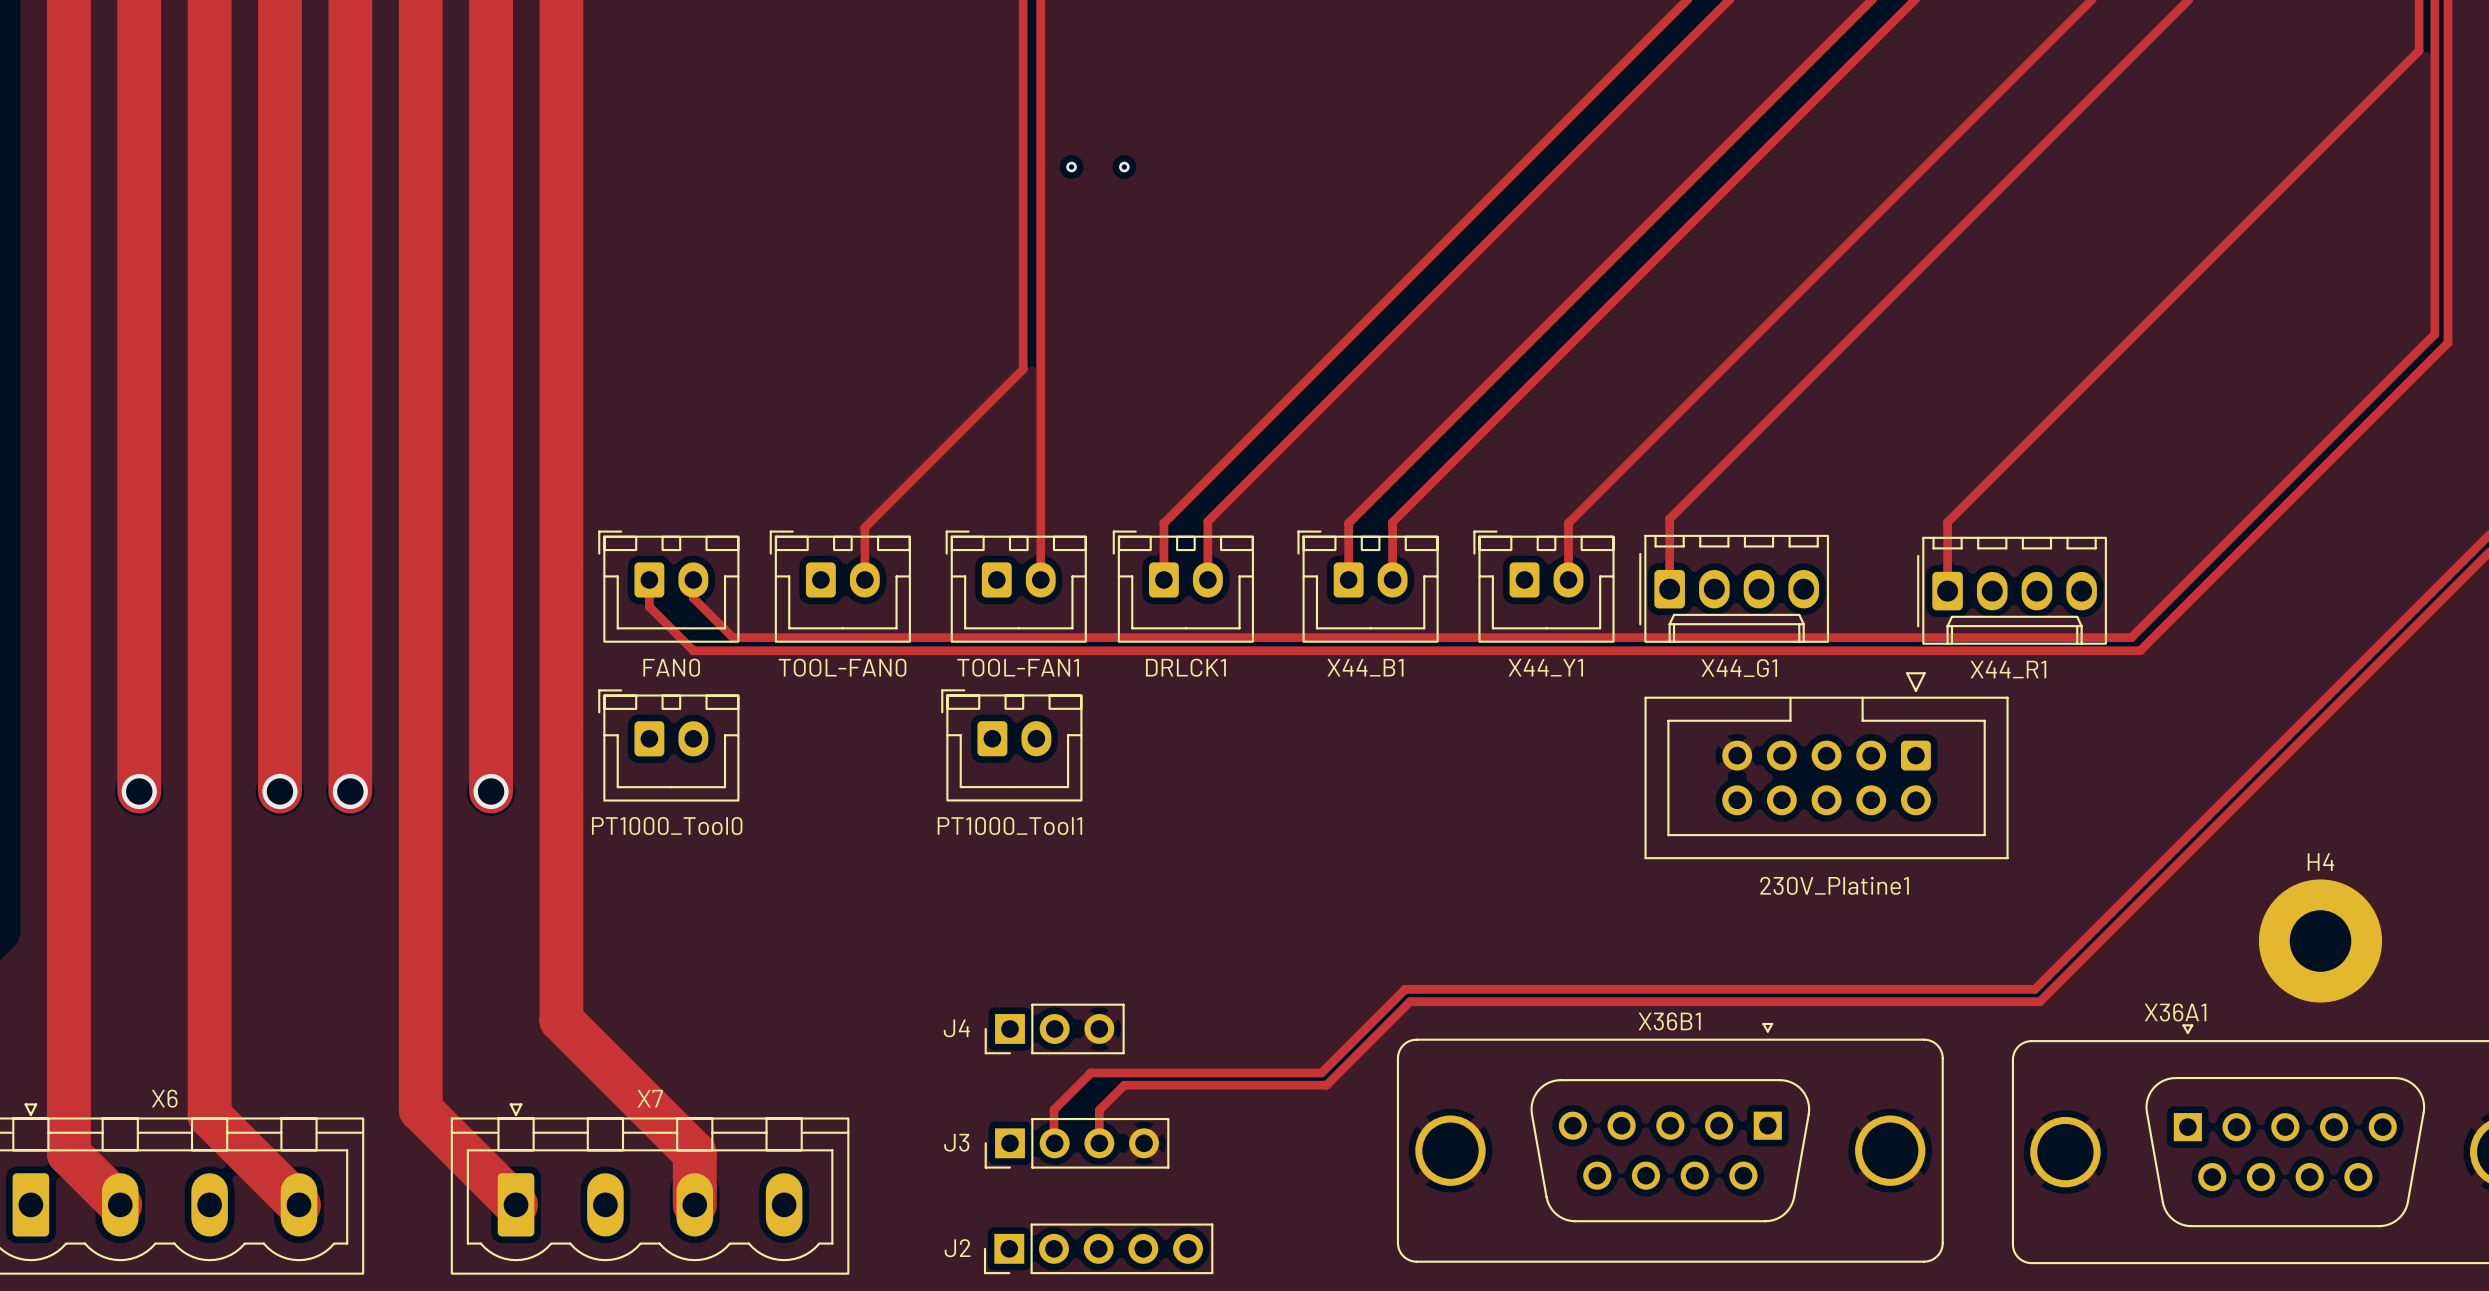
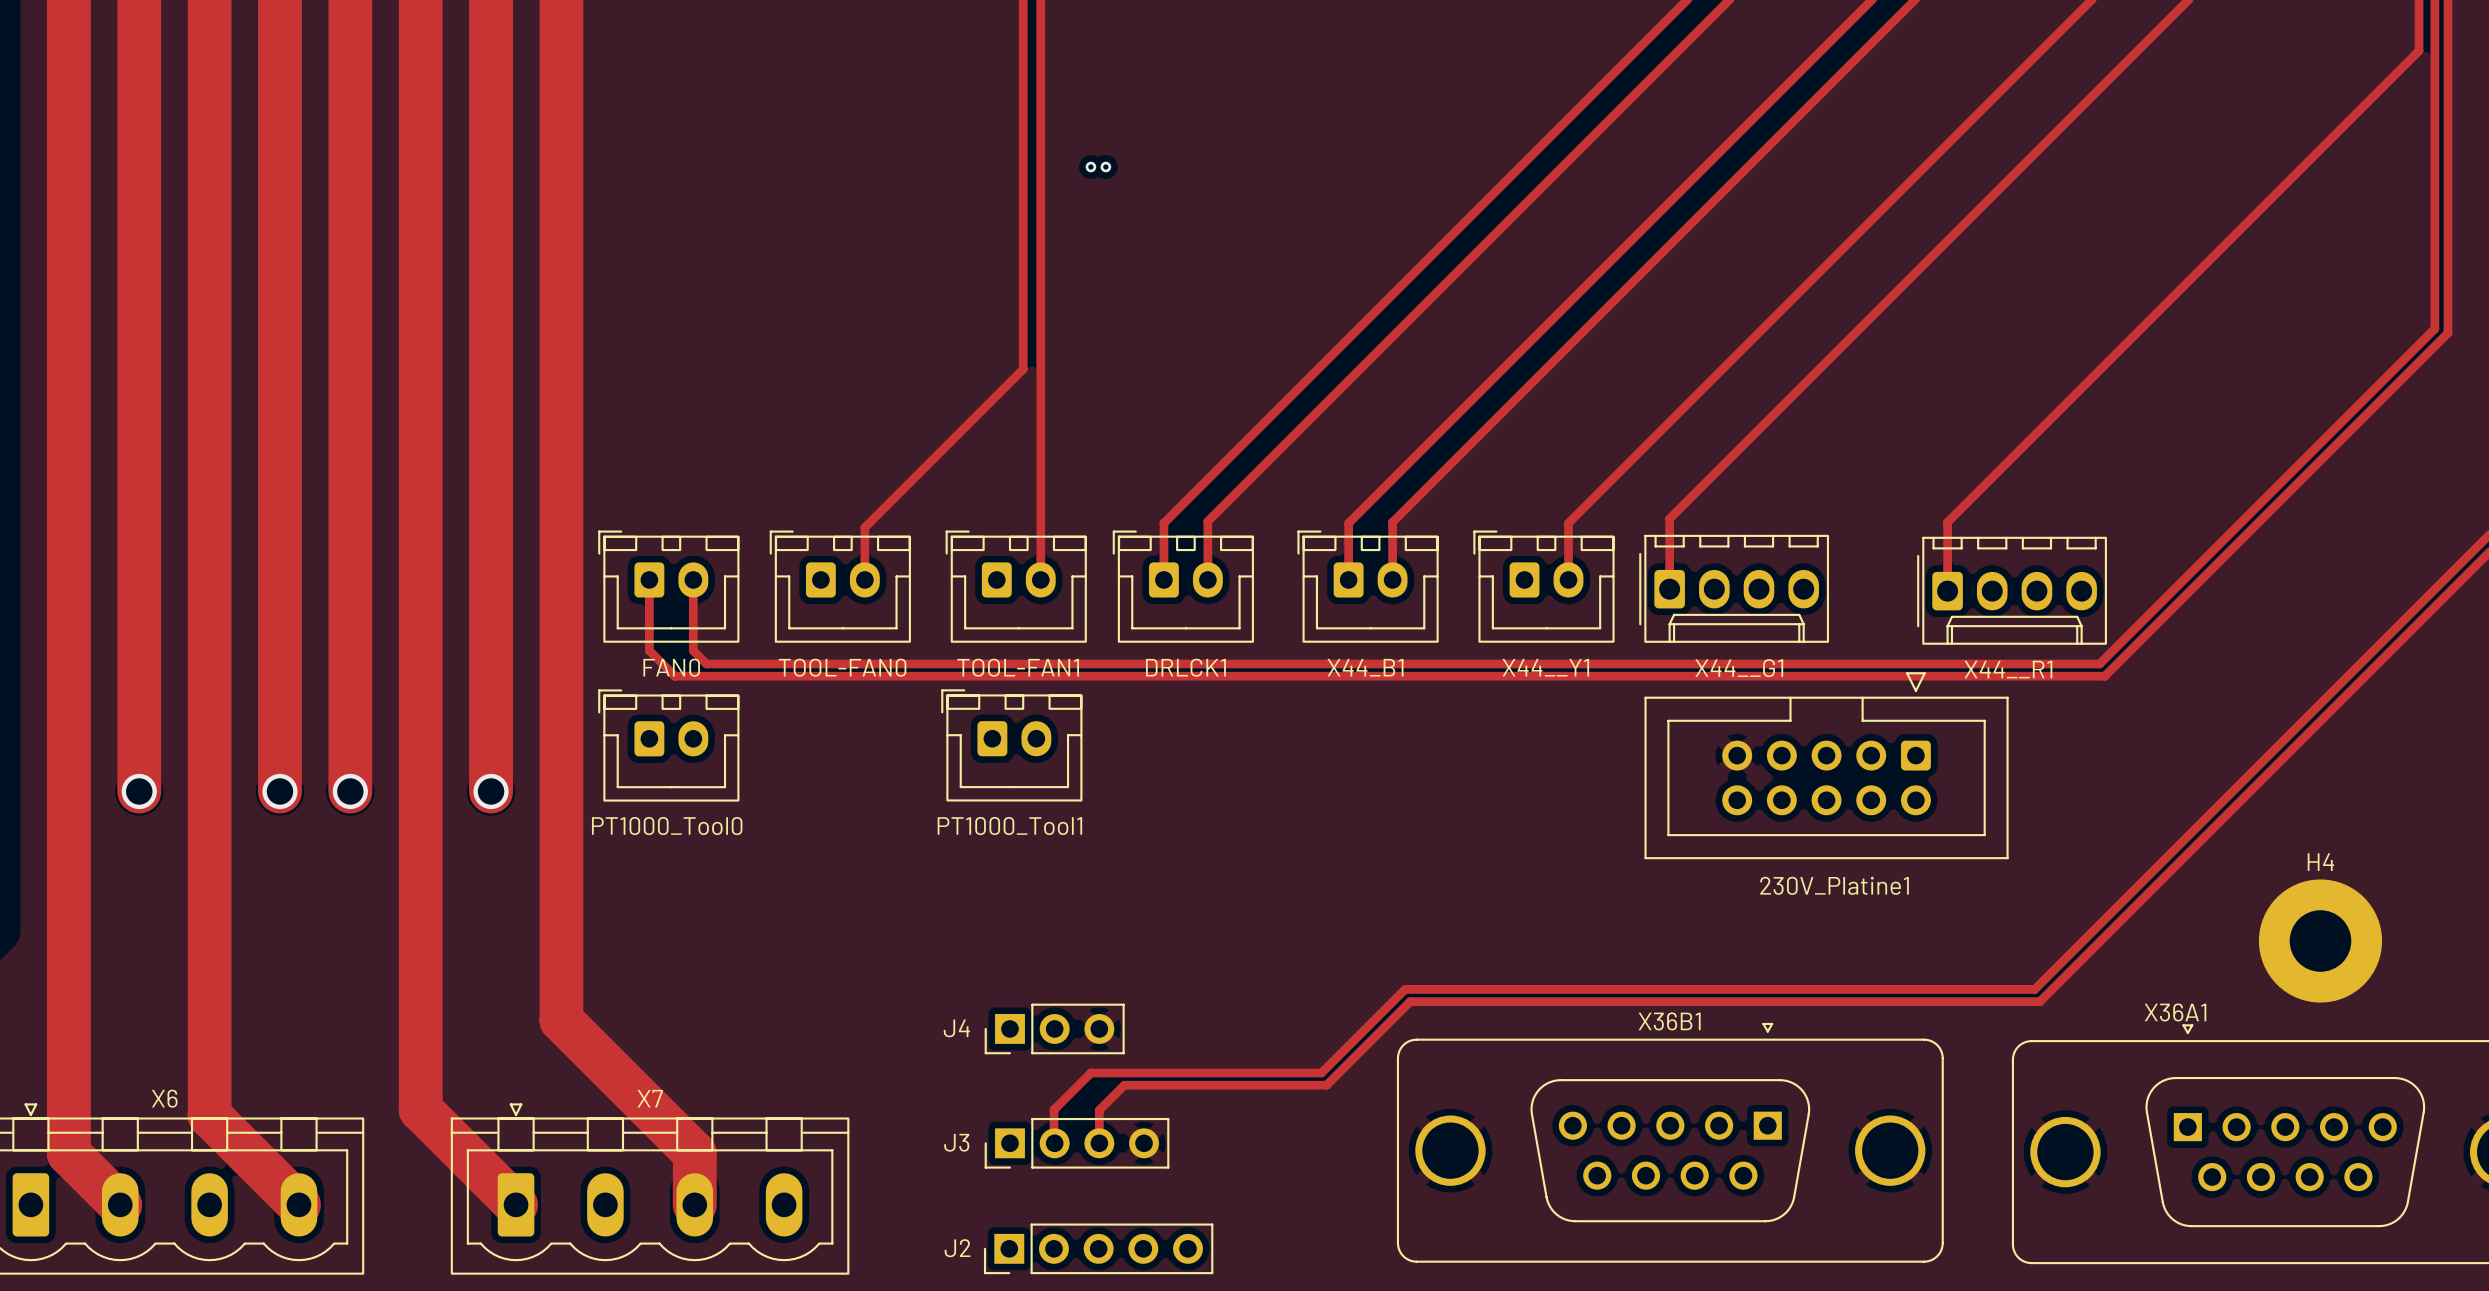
via: (1071, 167) -> none
via: none -> (1090, 167)
via: none -> (1105, 167)
via: (1124, 167) -> none
track: (2434, 328) (2434, 334) (2131, 637) (732, 637) (693, 597) -> (2434, 328) (2099, 663) (706, 663) (693, 650) (693, 597)
track: (2448, 333) (2448, 342) (2140, 650) (693, 650) (649, 606) -> (2448, 333) (2104, 676) (674, 676) (649, 650) (649, 606)
X44_Y1 name: X44_Y1 (1545, 667) -> X44__Y1 (1545, 667)
X44_G1 name: X44_G1 (1739, 668) -> X44__G1 (1739, 668)
X44_R1 name: X44_R1 (2008, 669) -> X44__R1 (2008, 669)

